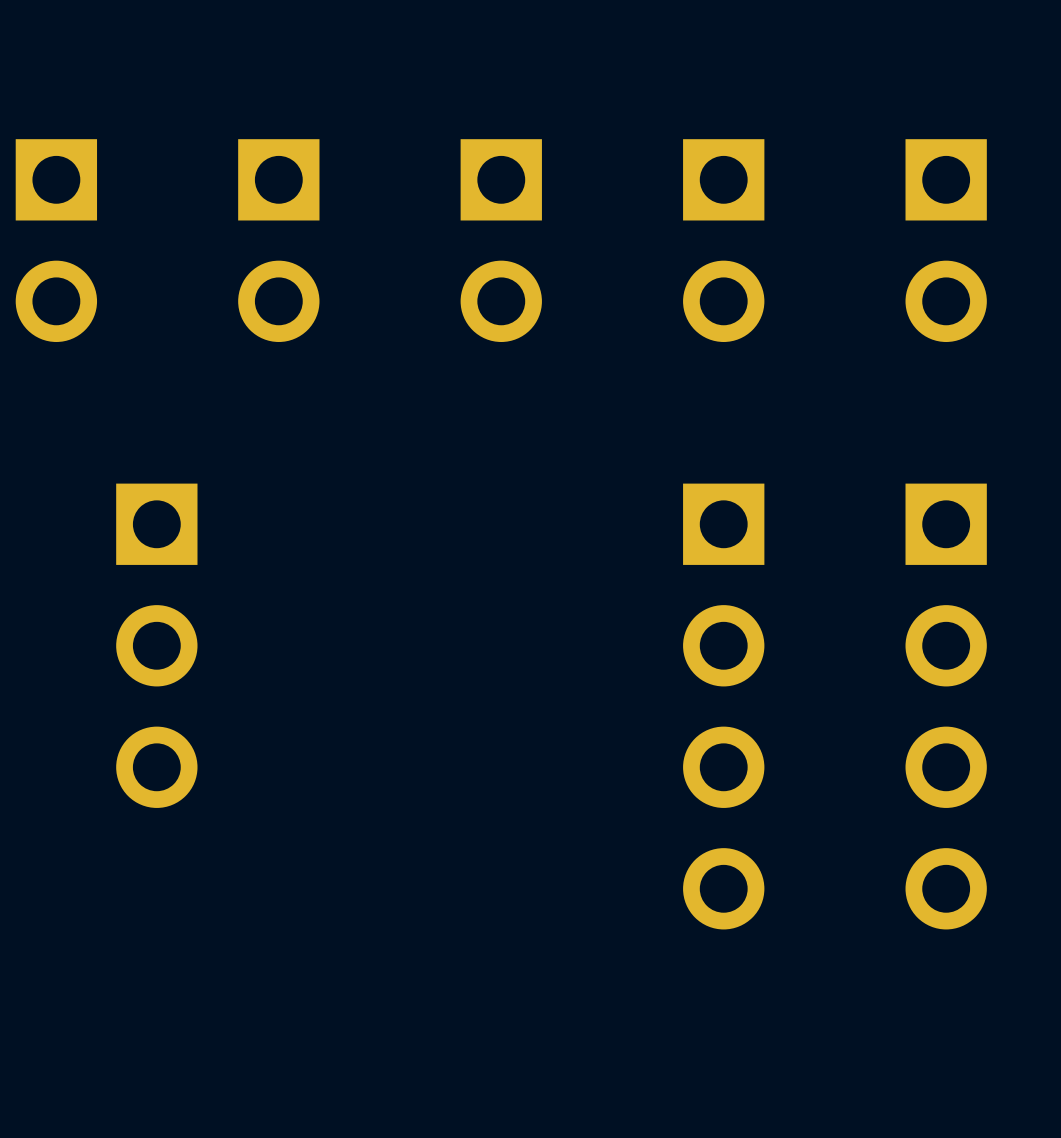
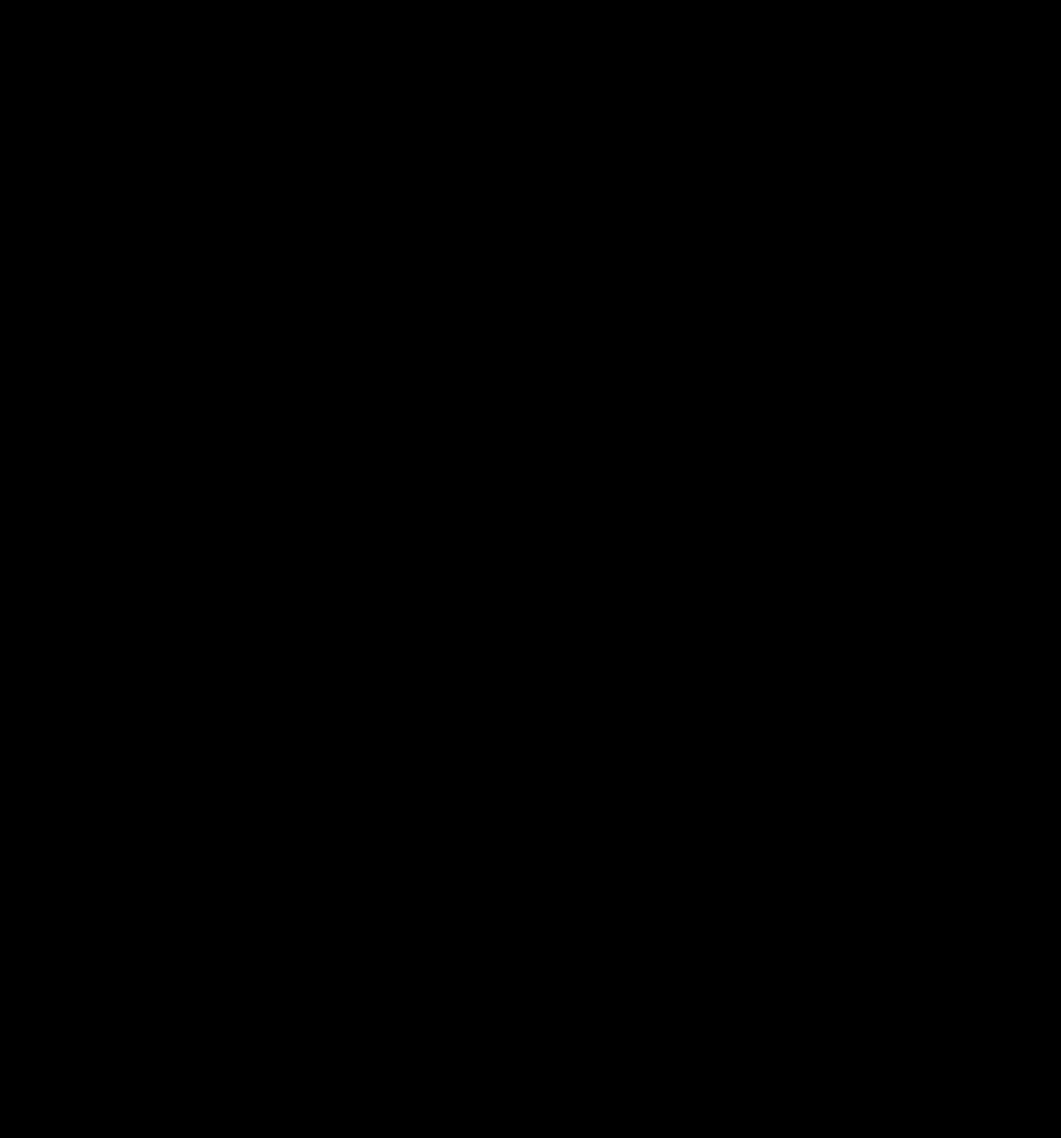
part: (56, 240) -> none
part: (278, 240) -> none
part: (501, 240) -> none
part: (723, 240) -> none
part: (946, 240) -> none
part: (156, 645) -> none
part: (723, 706) -> none
part: (946, 706) -> none

